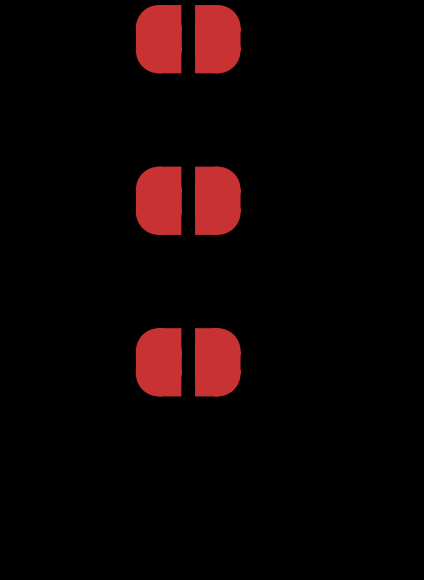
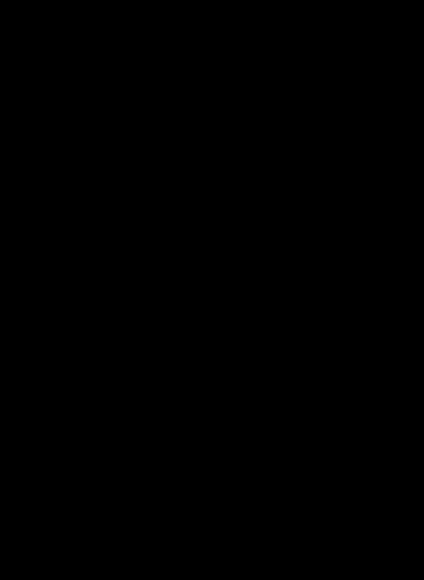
part: (188, 39) -> none
part: (188, 200) -> none
part: (188, 362) -> none

